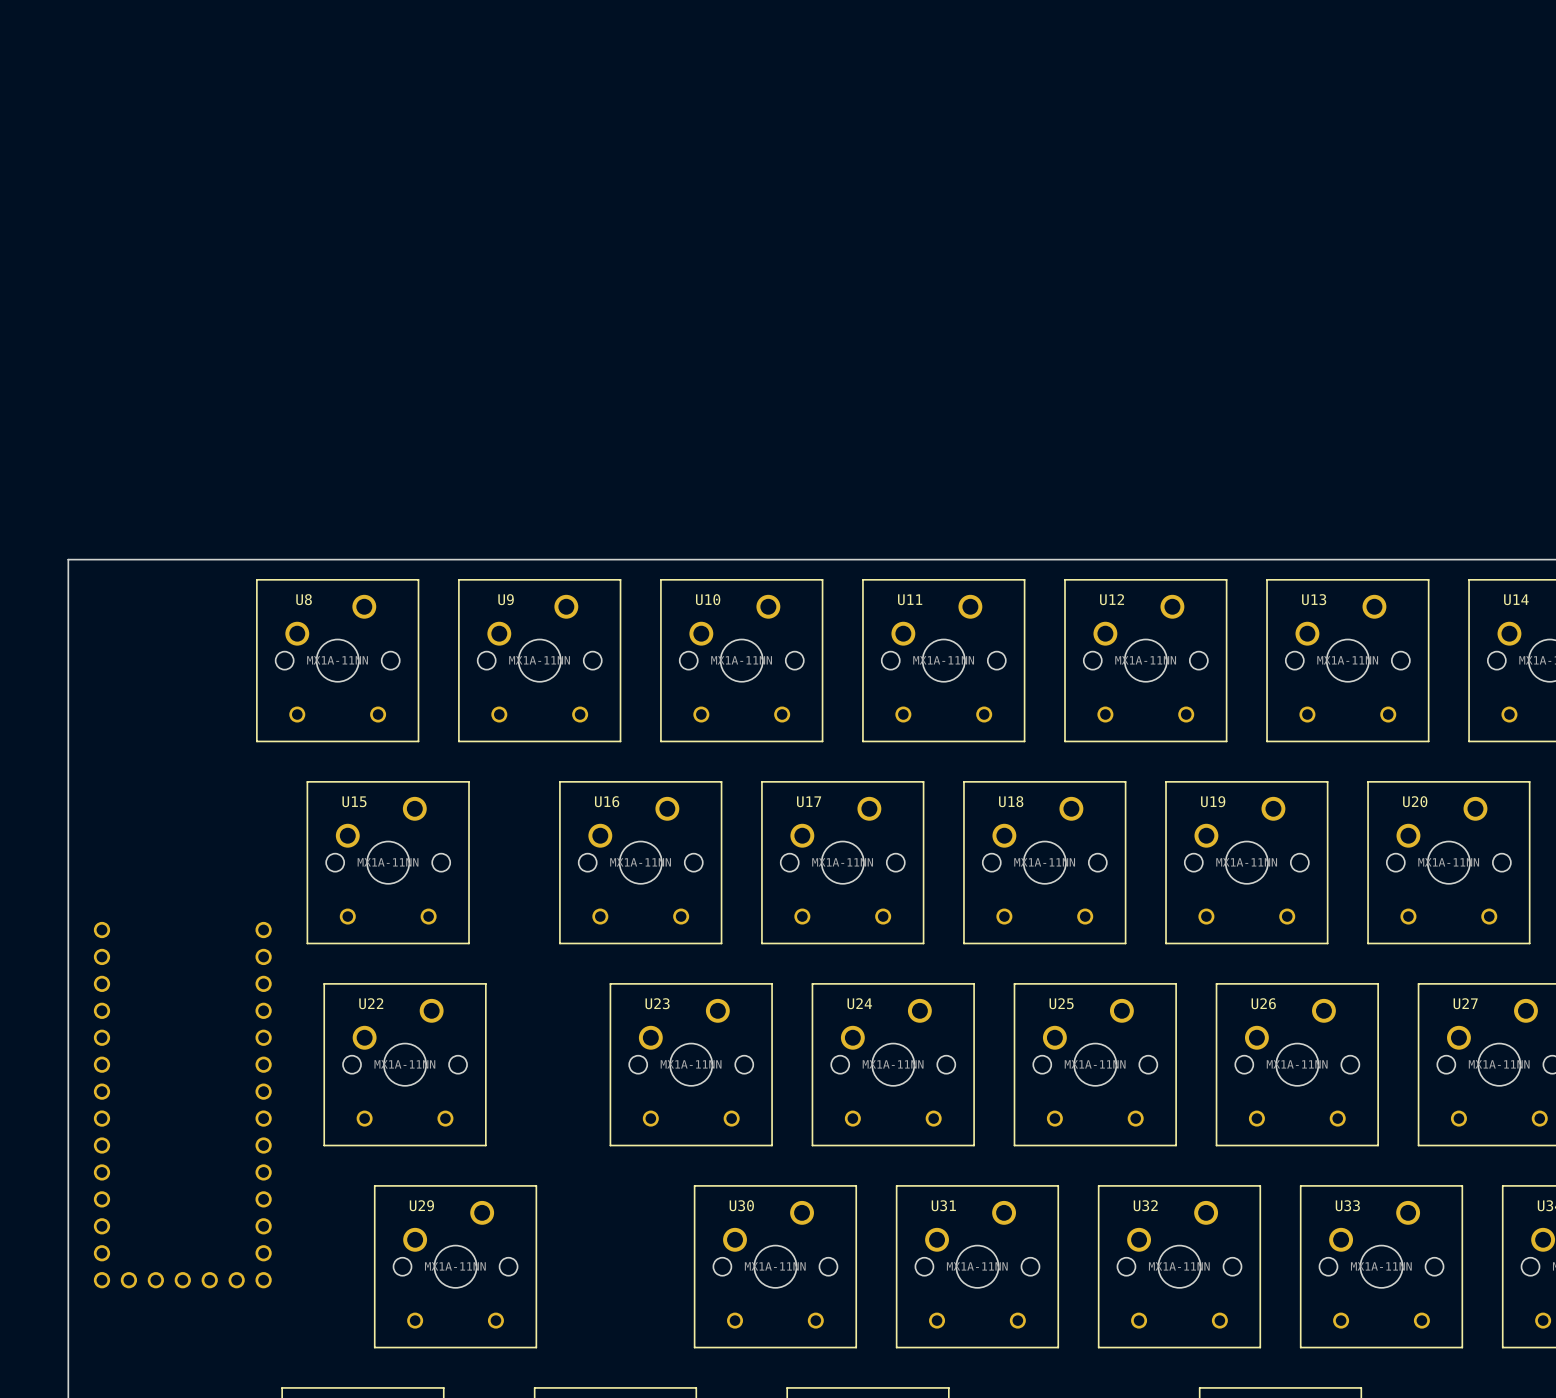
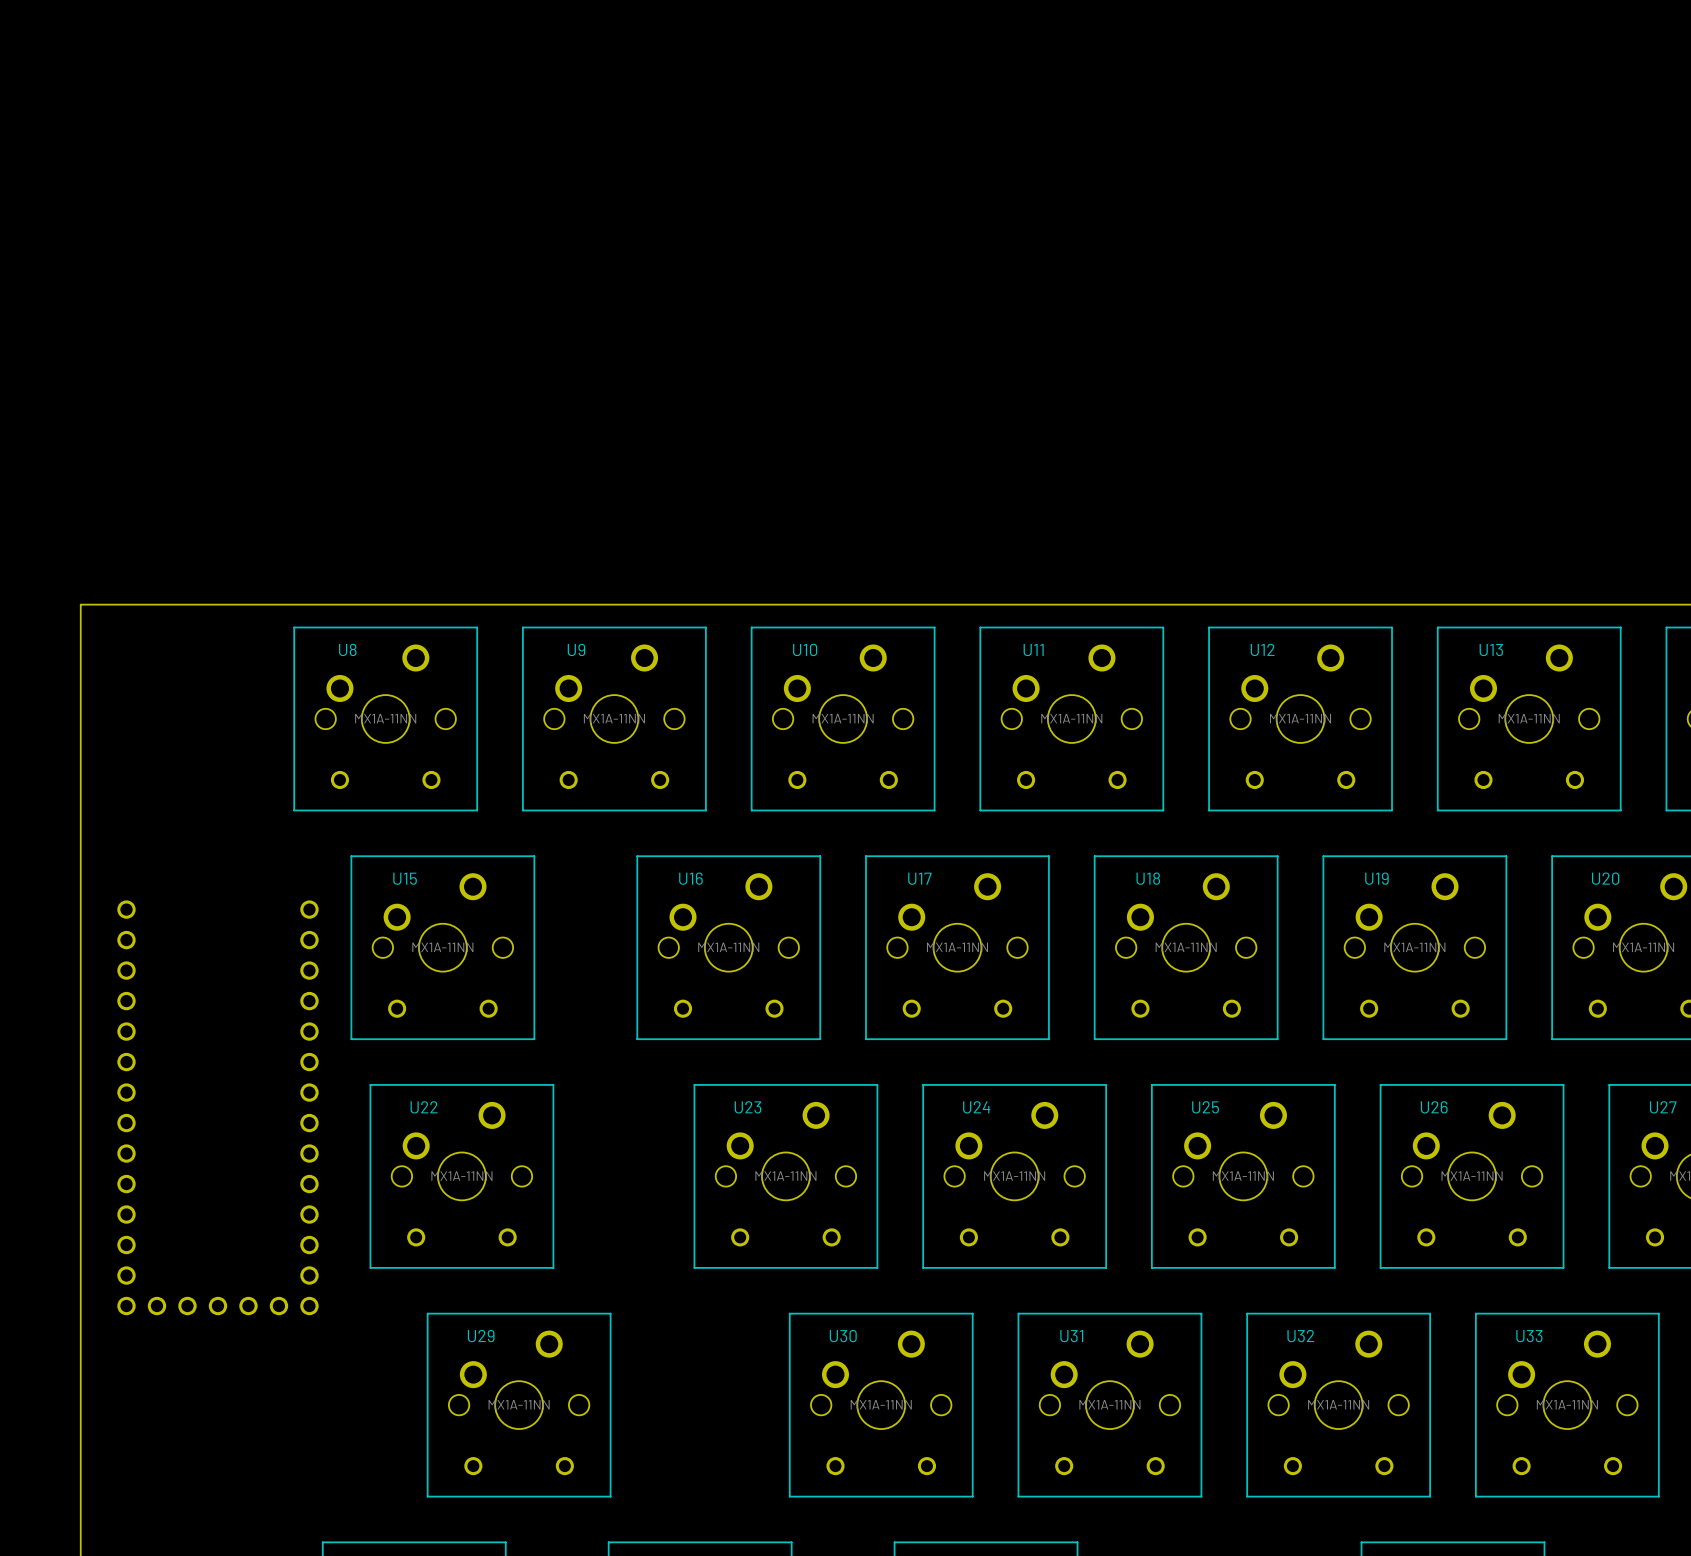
part position: (182, 1105) -> (217, 1107)

